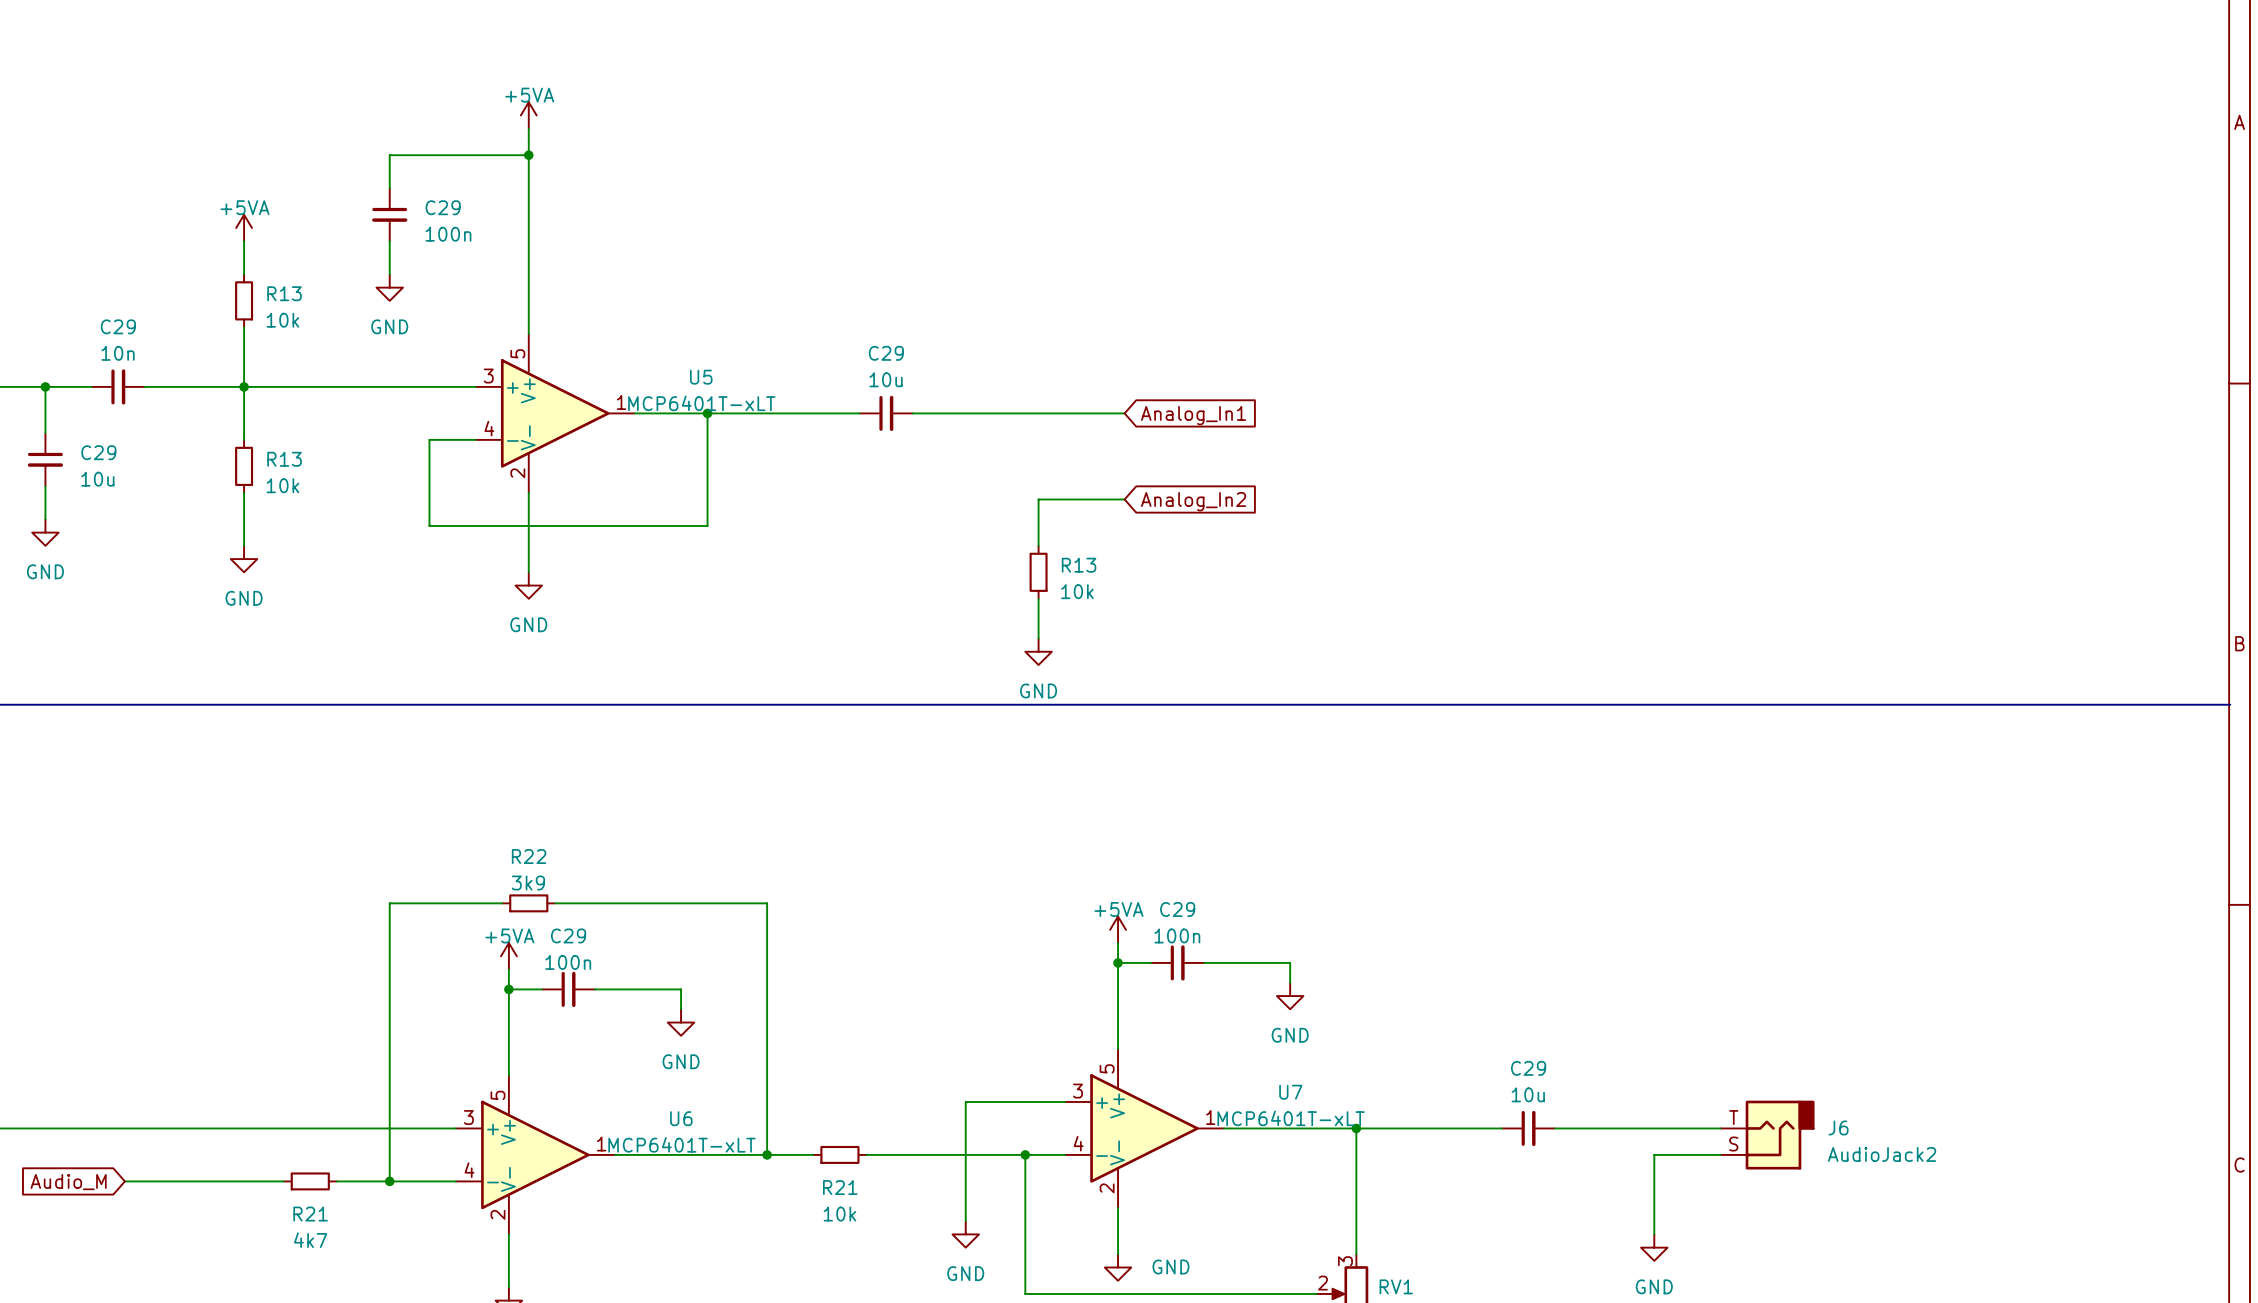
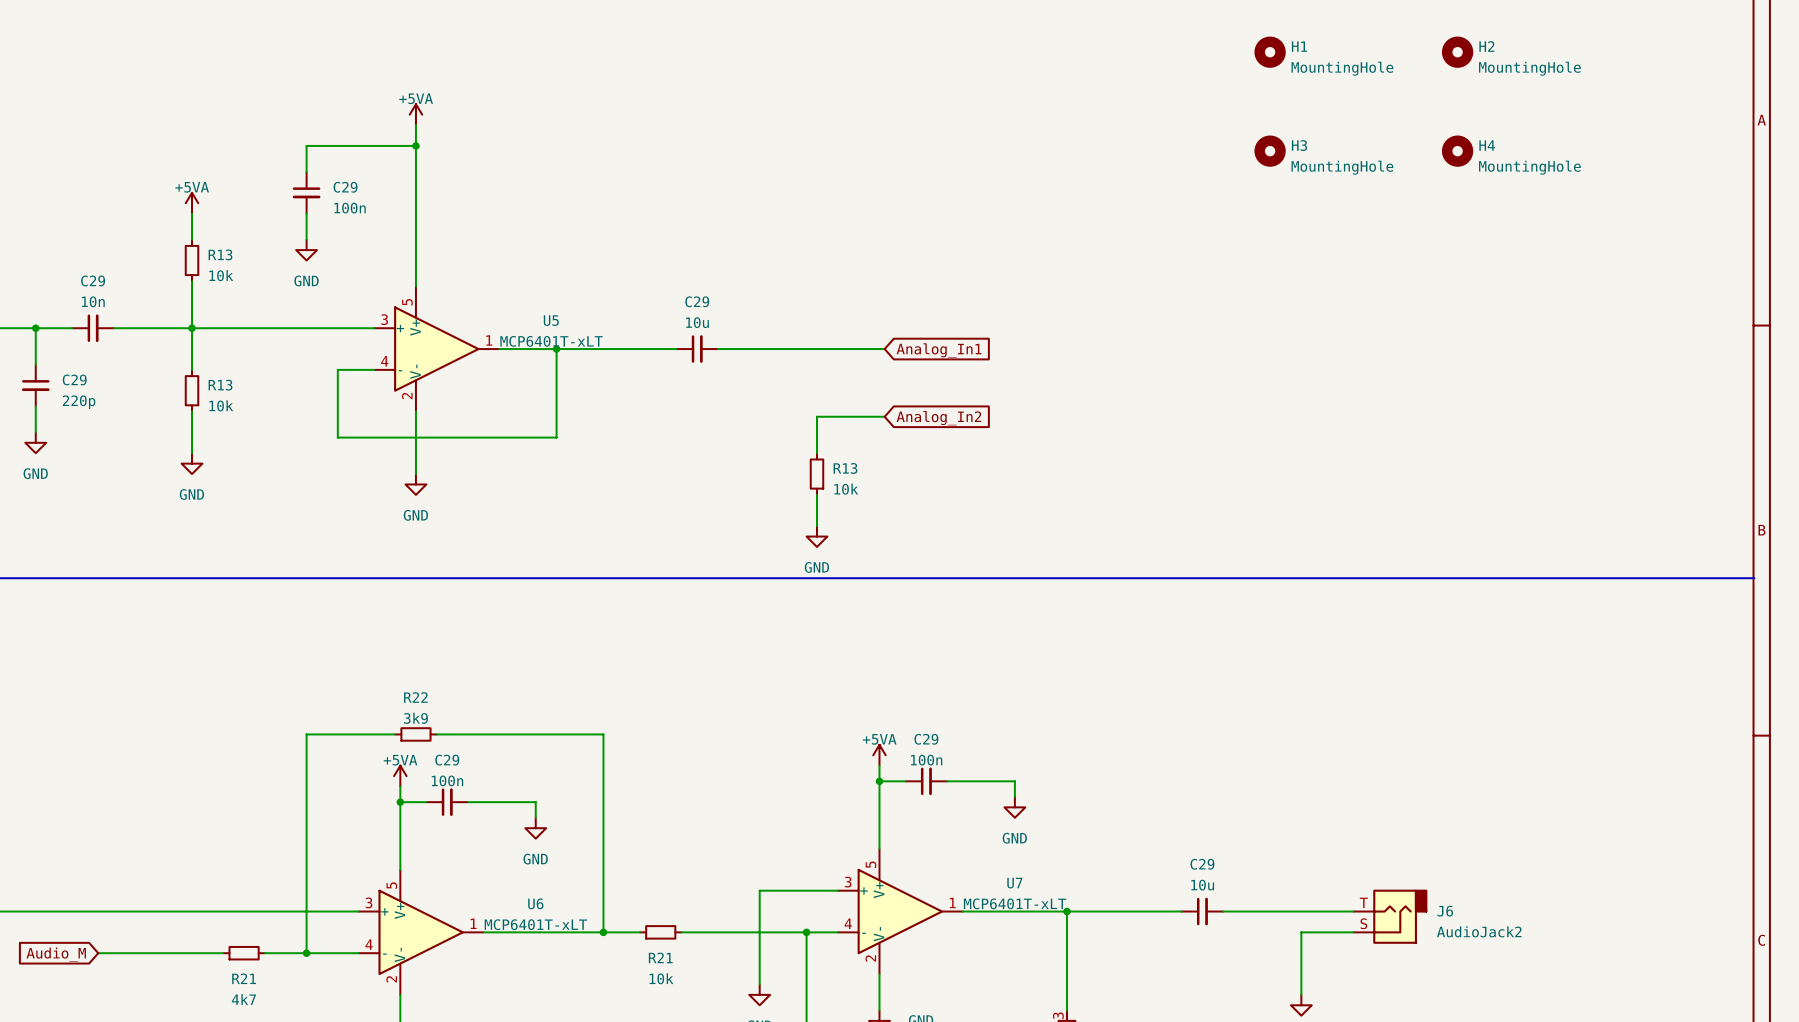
H1: none -> MountingHole (1270, 52)
H2: none -> MountingHole (1457, 52)
H3: none -> MountingHole (1270, 151)
H4: none -> MountingHole (1457, 151)
C29 value: 10u (97, 479) -> 220p (79, 402)

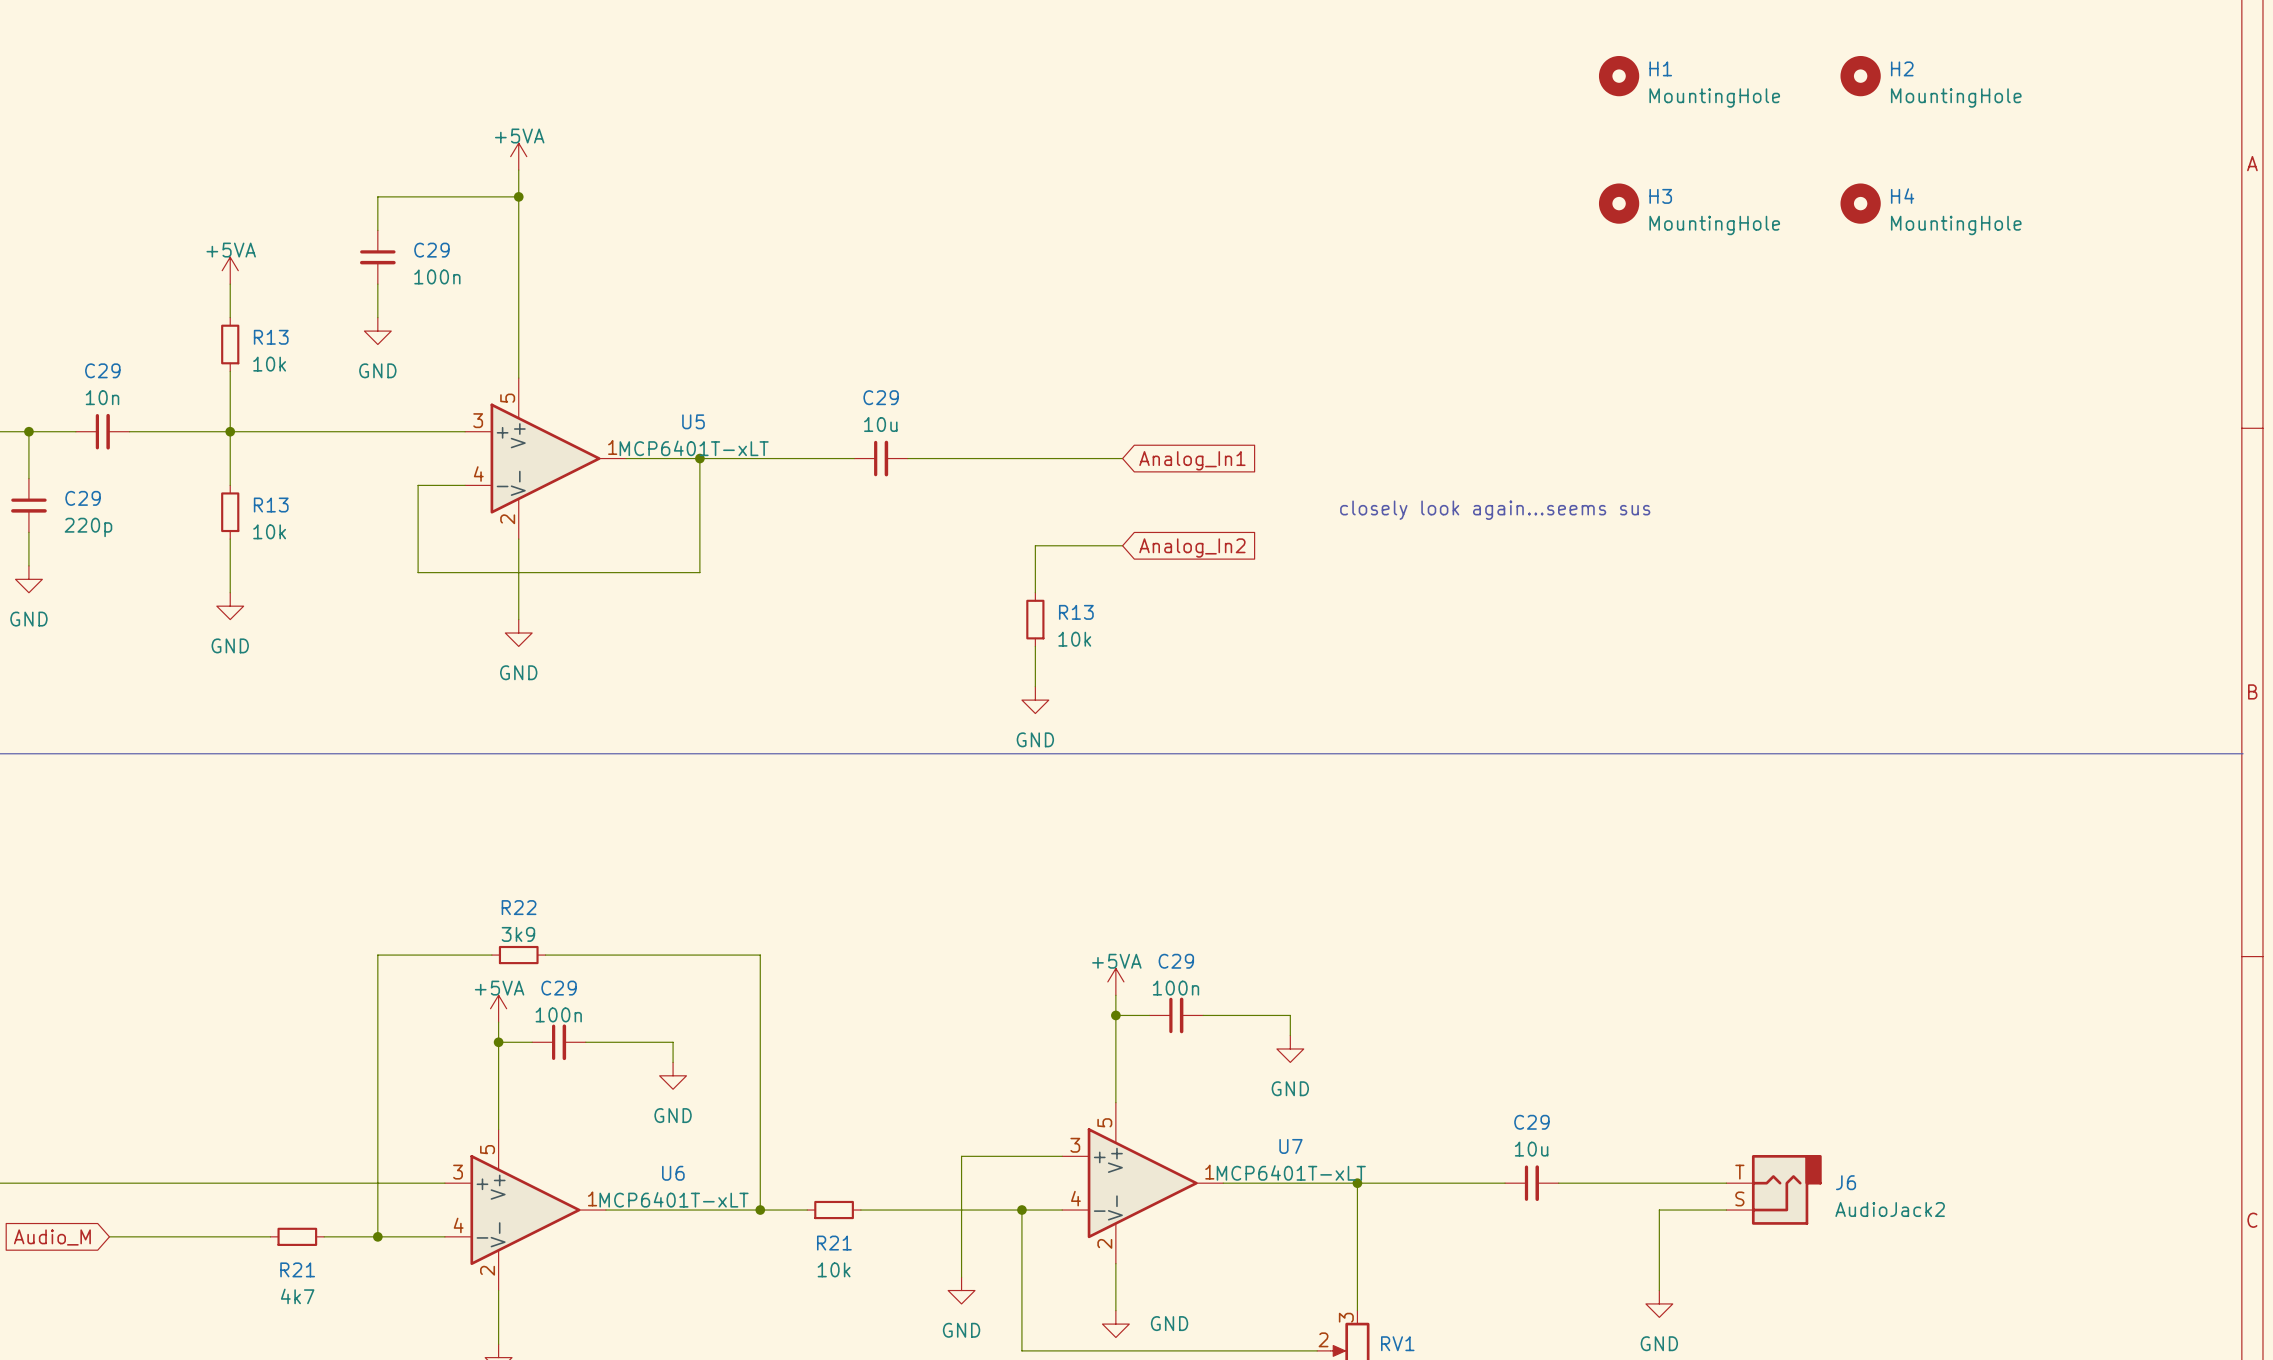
text: none -> closely look again...seems sus (1495, 510)

